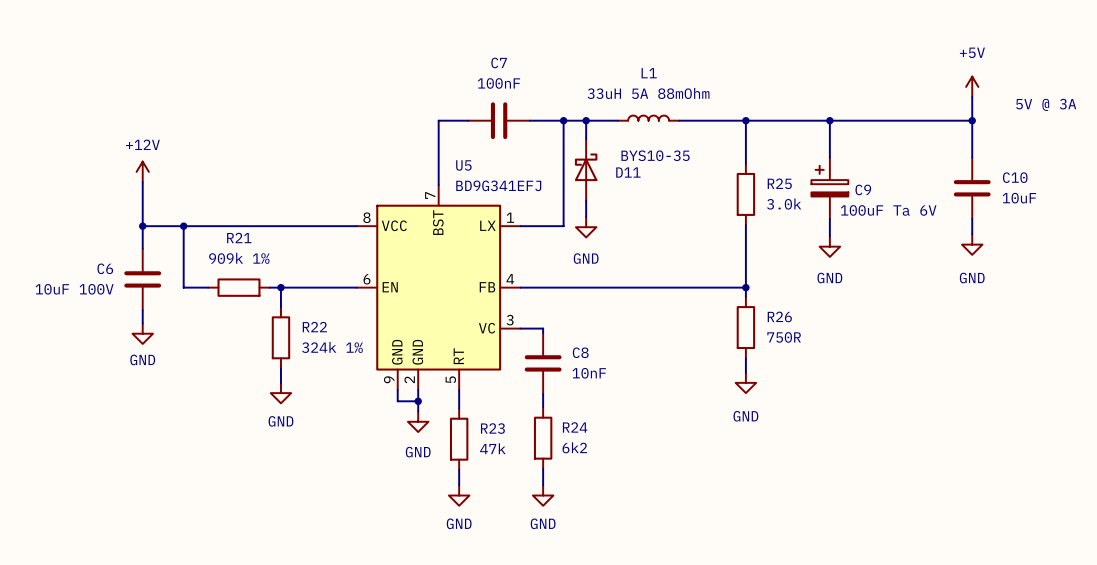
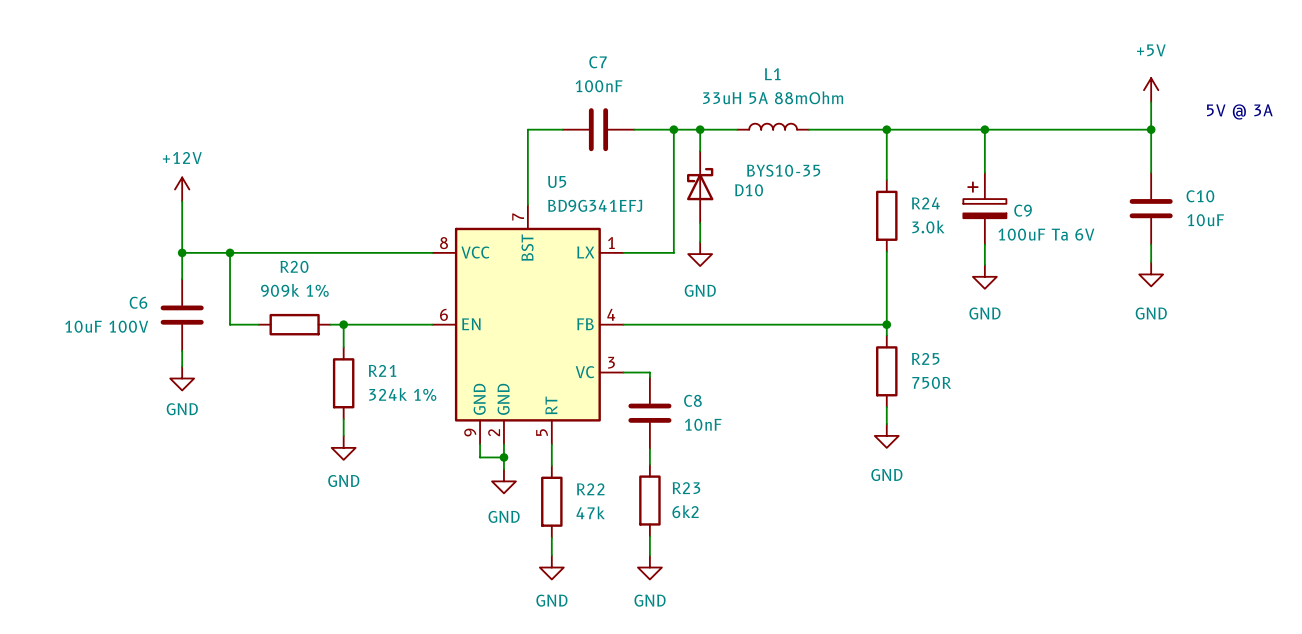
D11 name: D11 (628, 172) -> D10 (749, 190)
R25 name: R25 (779, 183) -> R24 (925, 203)
R21 name: R21 (239, 238) -> R20 (294, 266)
R26 name: R26 (779, 316) -> R25 (925, 358)
R22 name: R22 (314, 327) -> R21 (382, 370)
R24 name: R24 (575, 427) -> R23 (686, 488)
R23 name: R23 (492, 428) -> R22 (590, 489)

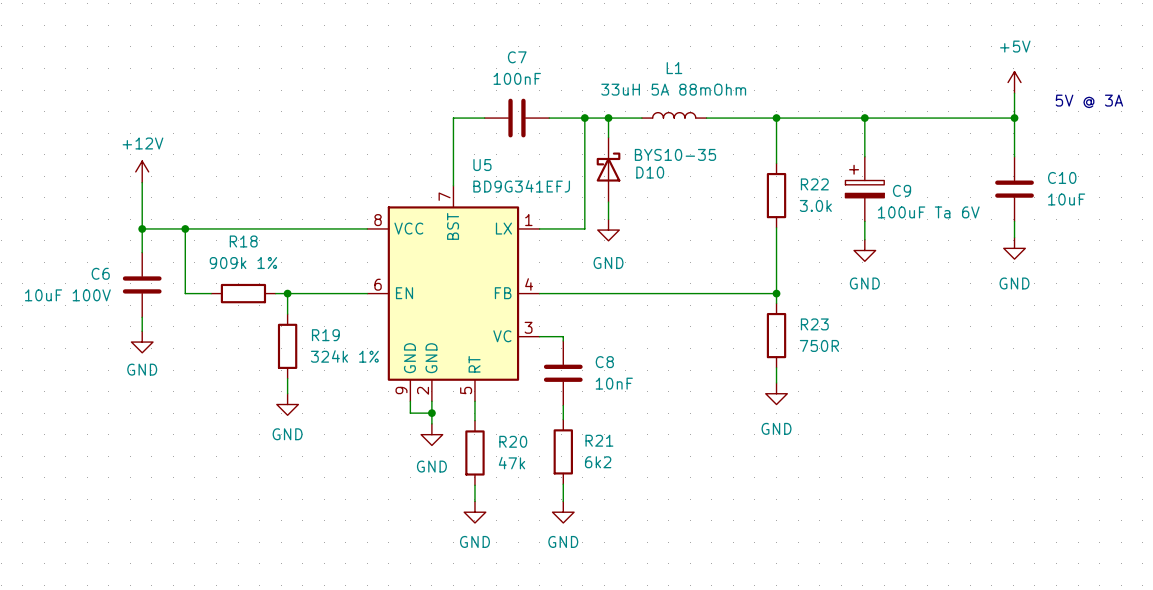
R24 name: R24 (925, 203) -> R22 (814, 184)
R20 name: R20 (294, 266) -> R18 (243, 241)
R25 name: R25 (925, 358) -> R23 (814, 324)
R21 name: R21 (382, 370) -> R19 (325, 335)
R23 name: R23 (686, 488) -> R21 (599, 440)
R22 name: R22 (590, 489) -> R20 (513, 441)

